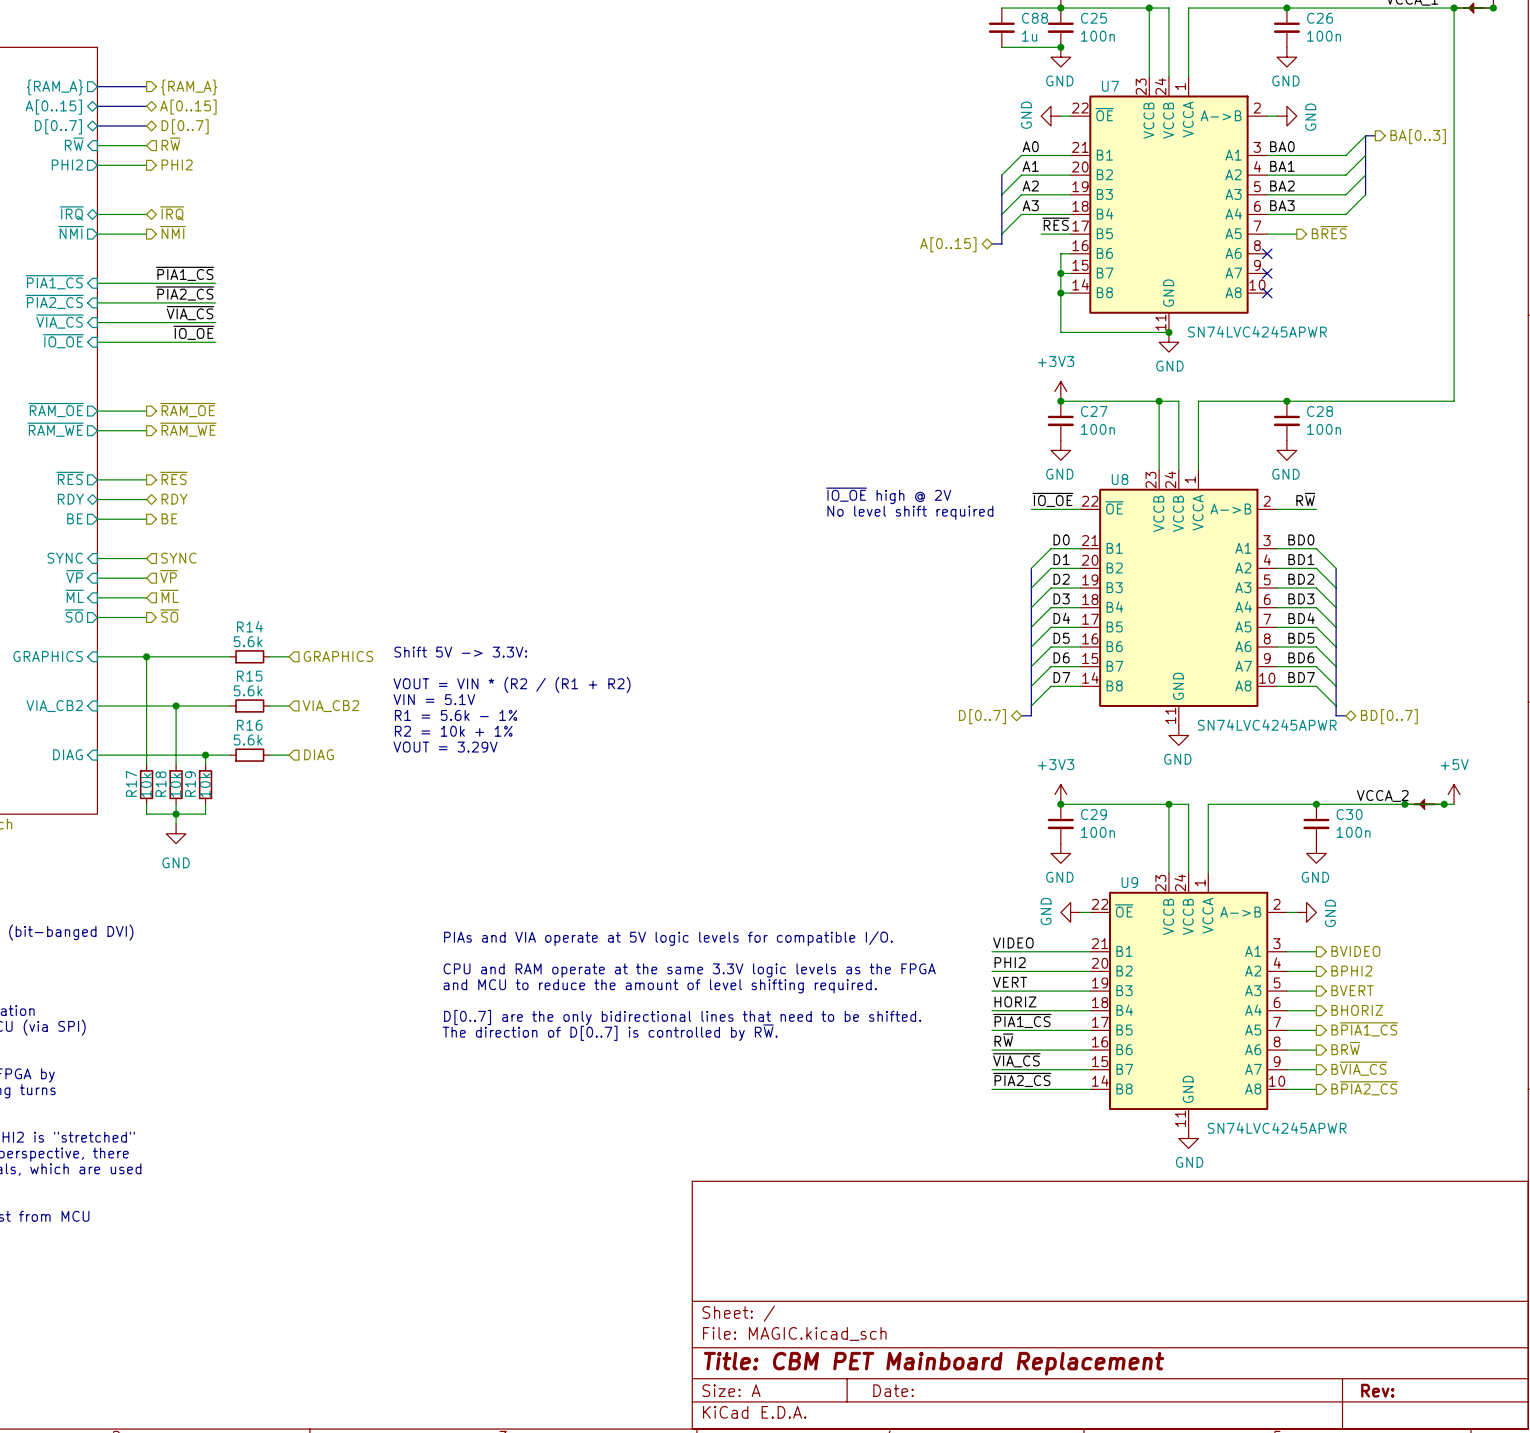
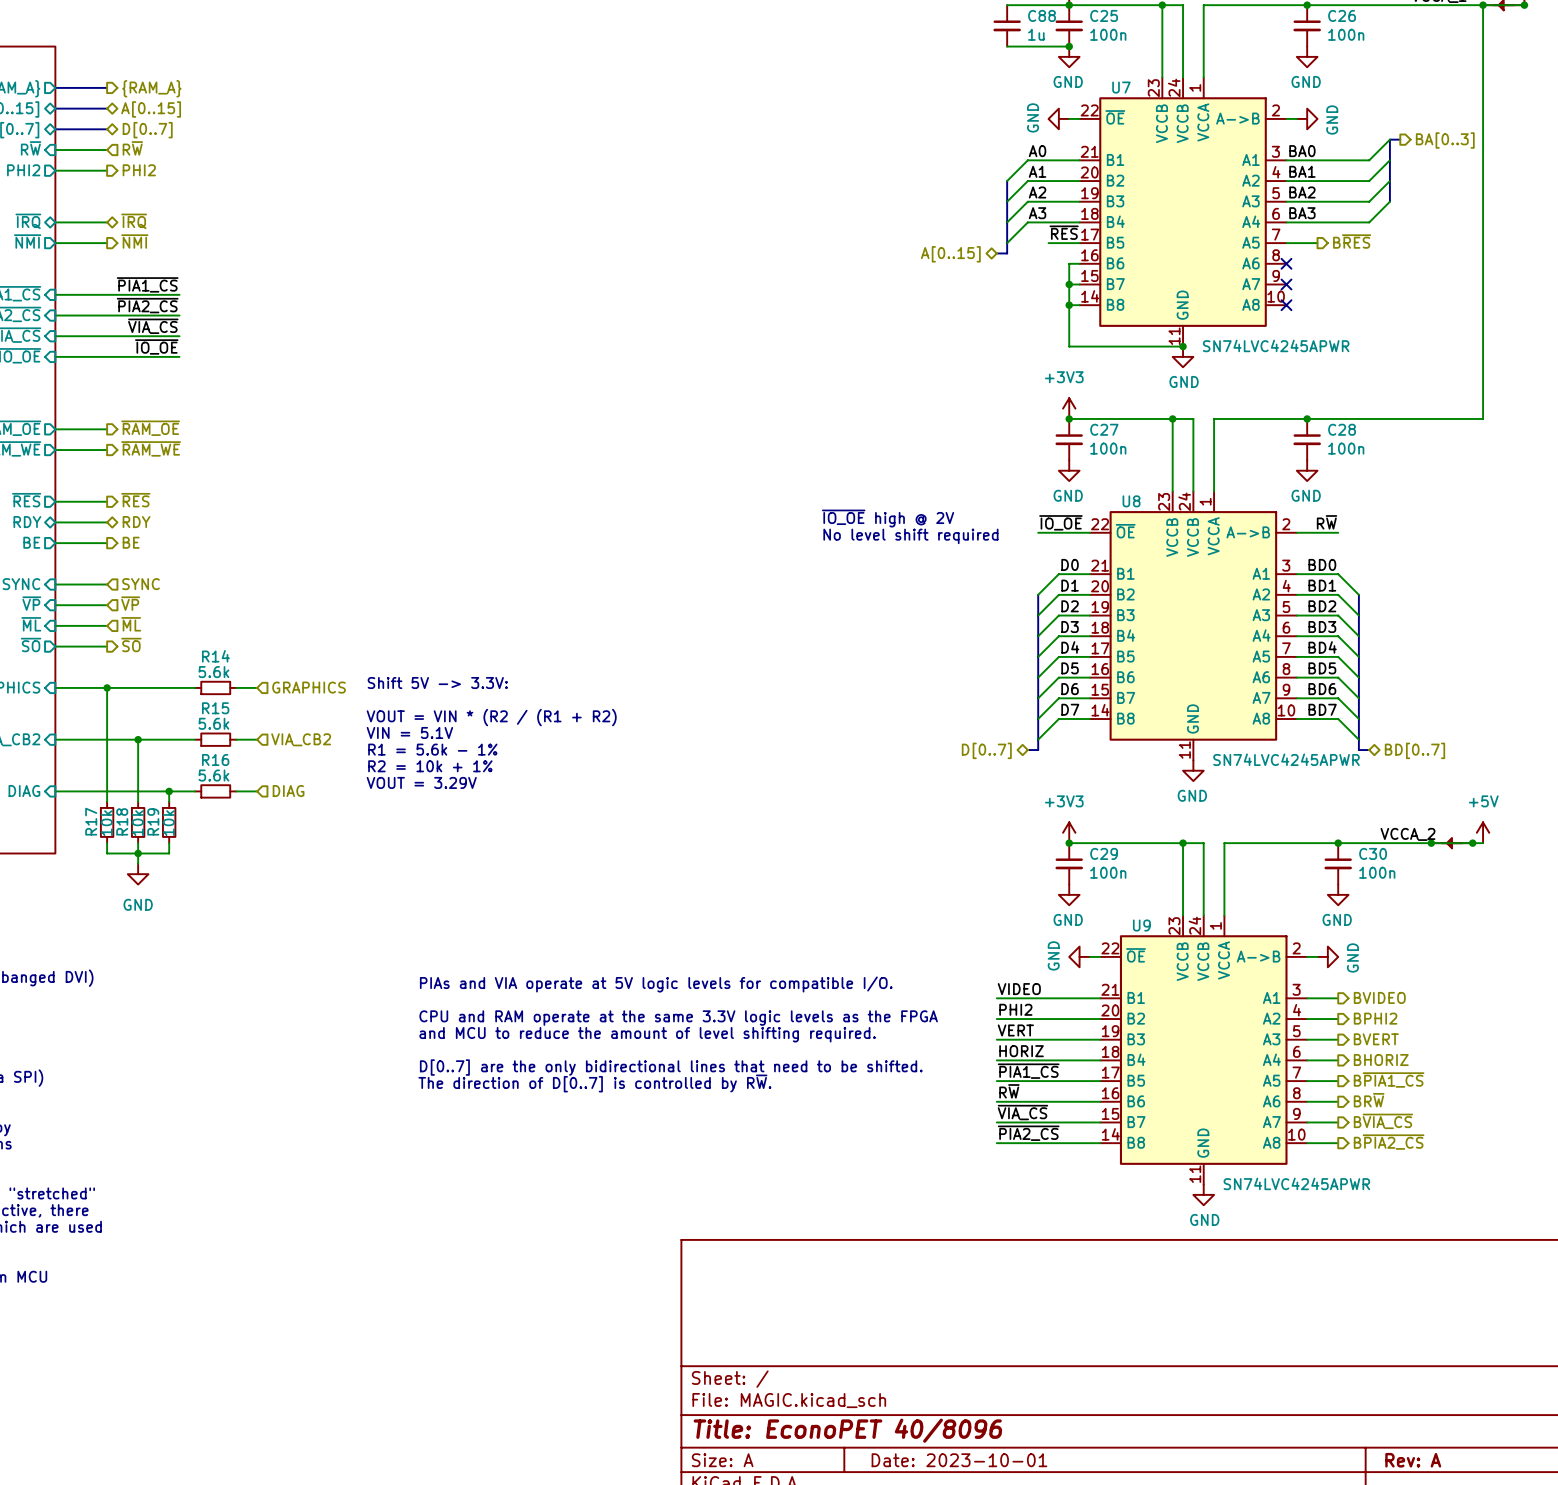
title block: Title: CBM PET Mainboard Replacement (934, 1363) -> Title: EconoPET 40/8096 (847, 1430)
title block: Date: (893, 1390) -> Date: 2023-10-01 (959, 1460)
title block: Rev: (1377, 1390) -> Rev: A (1413, 1460)

